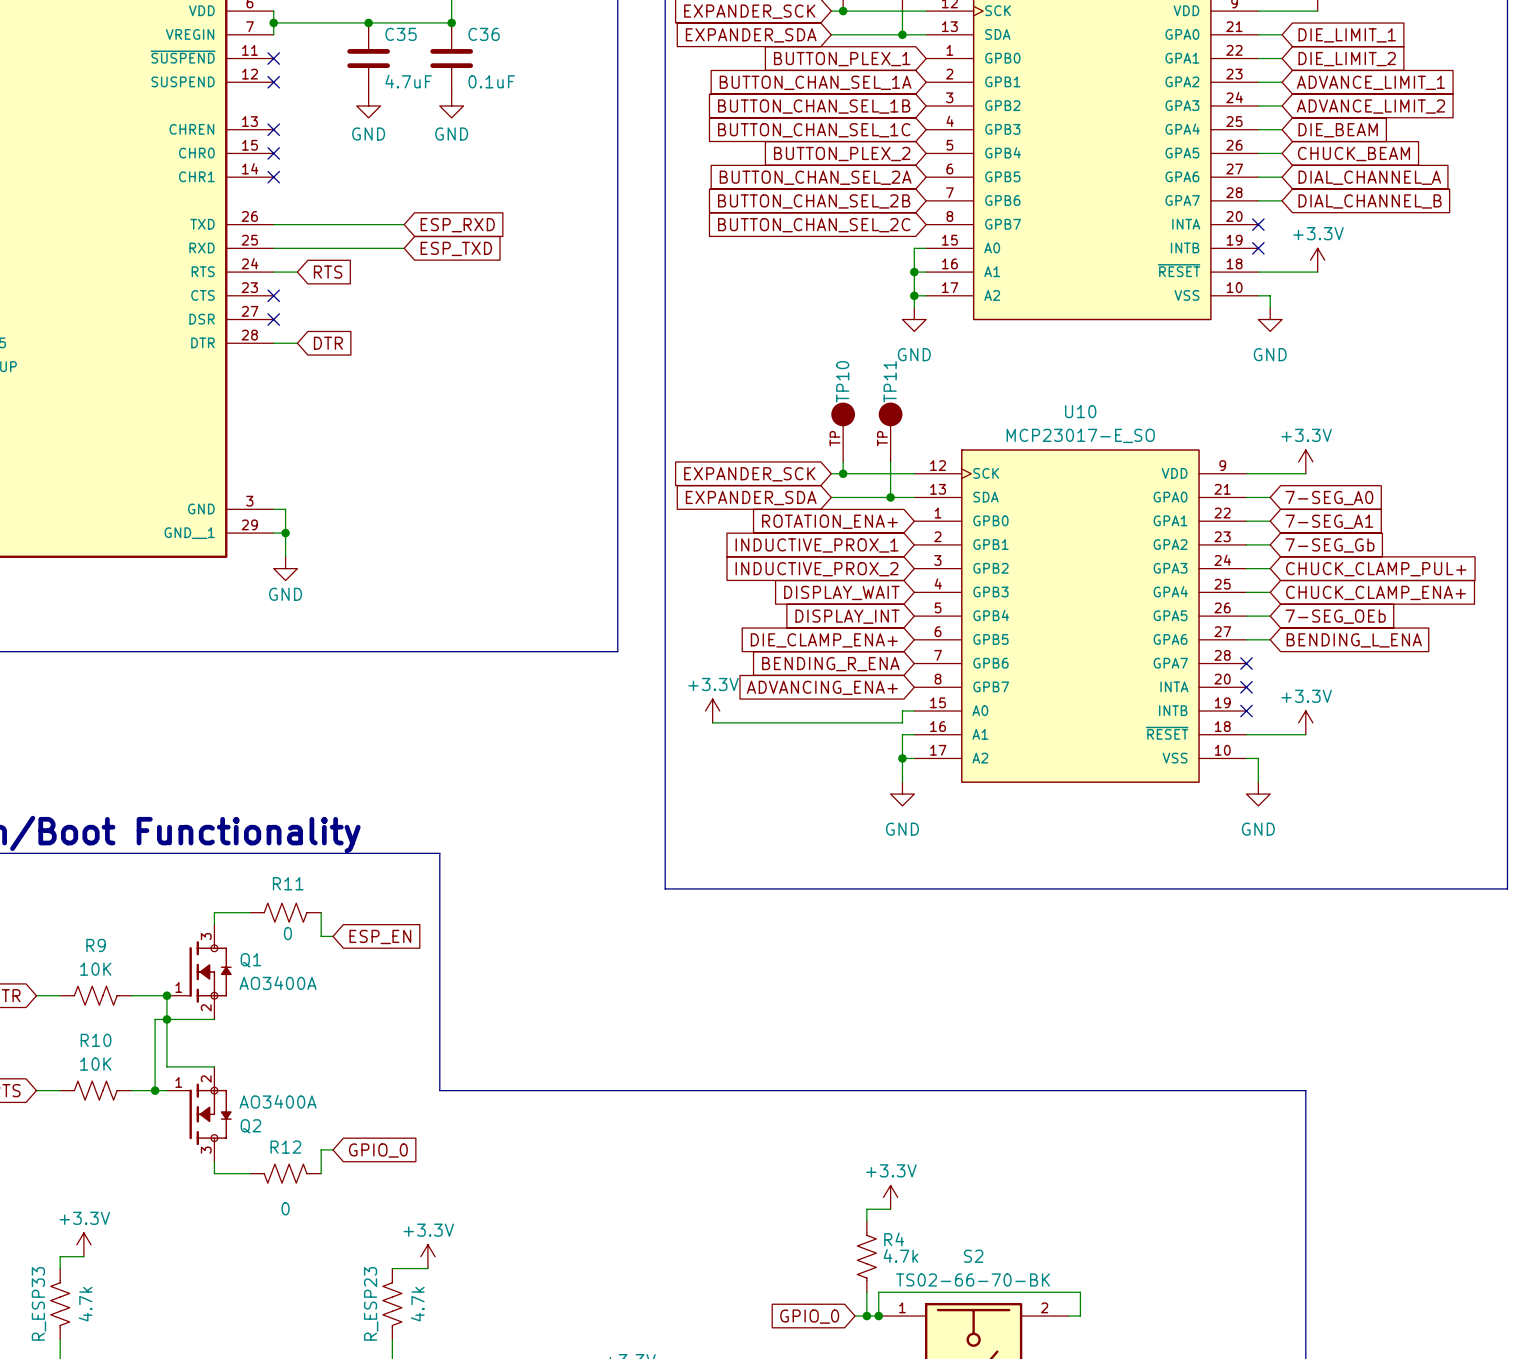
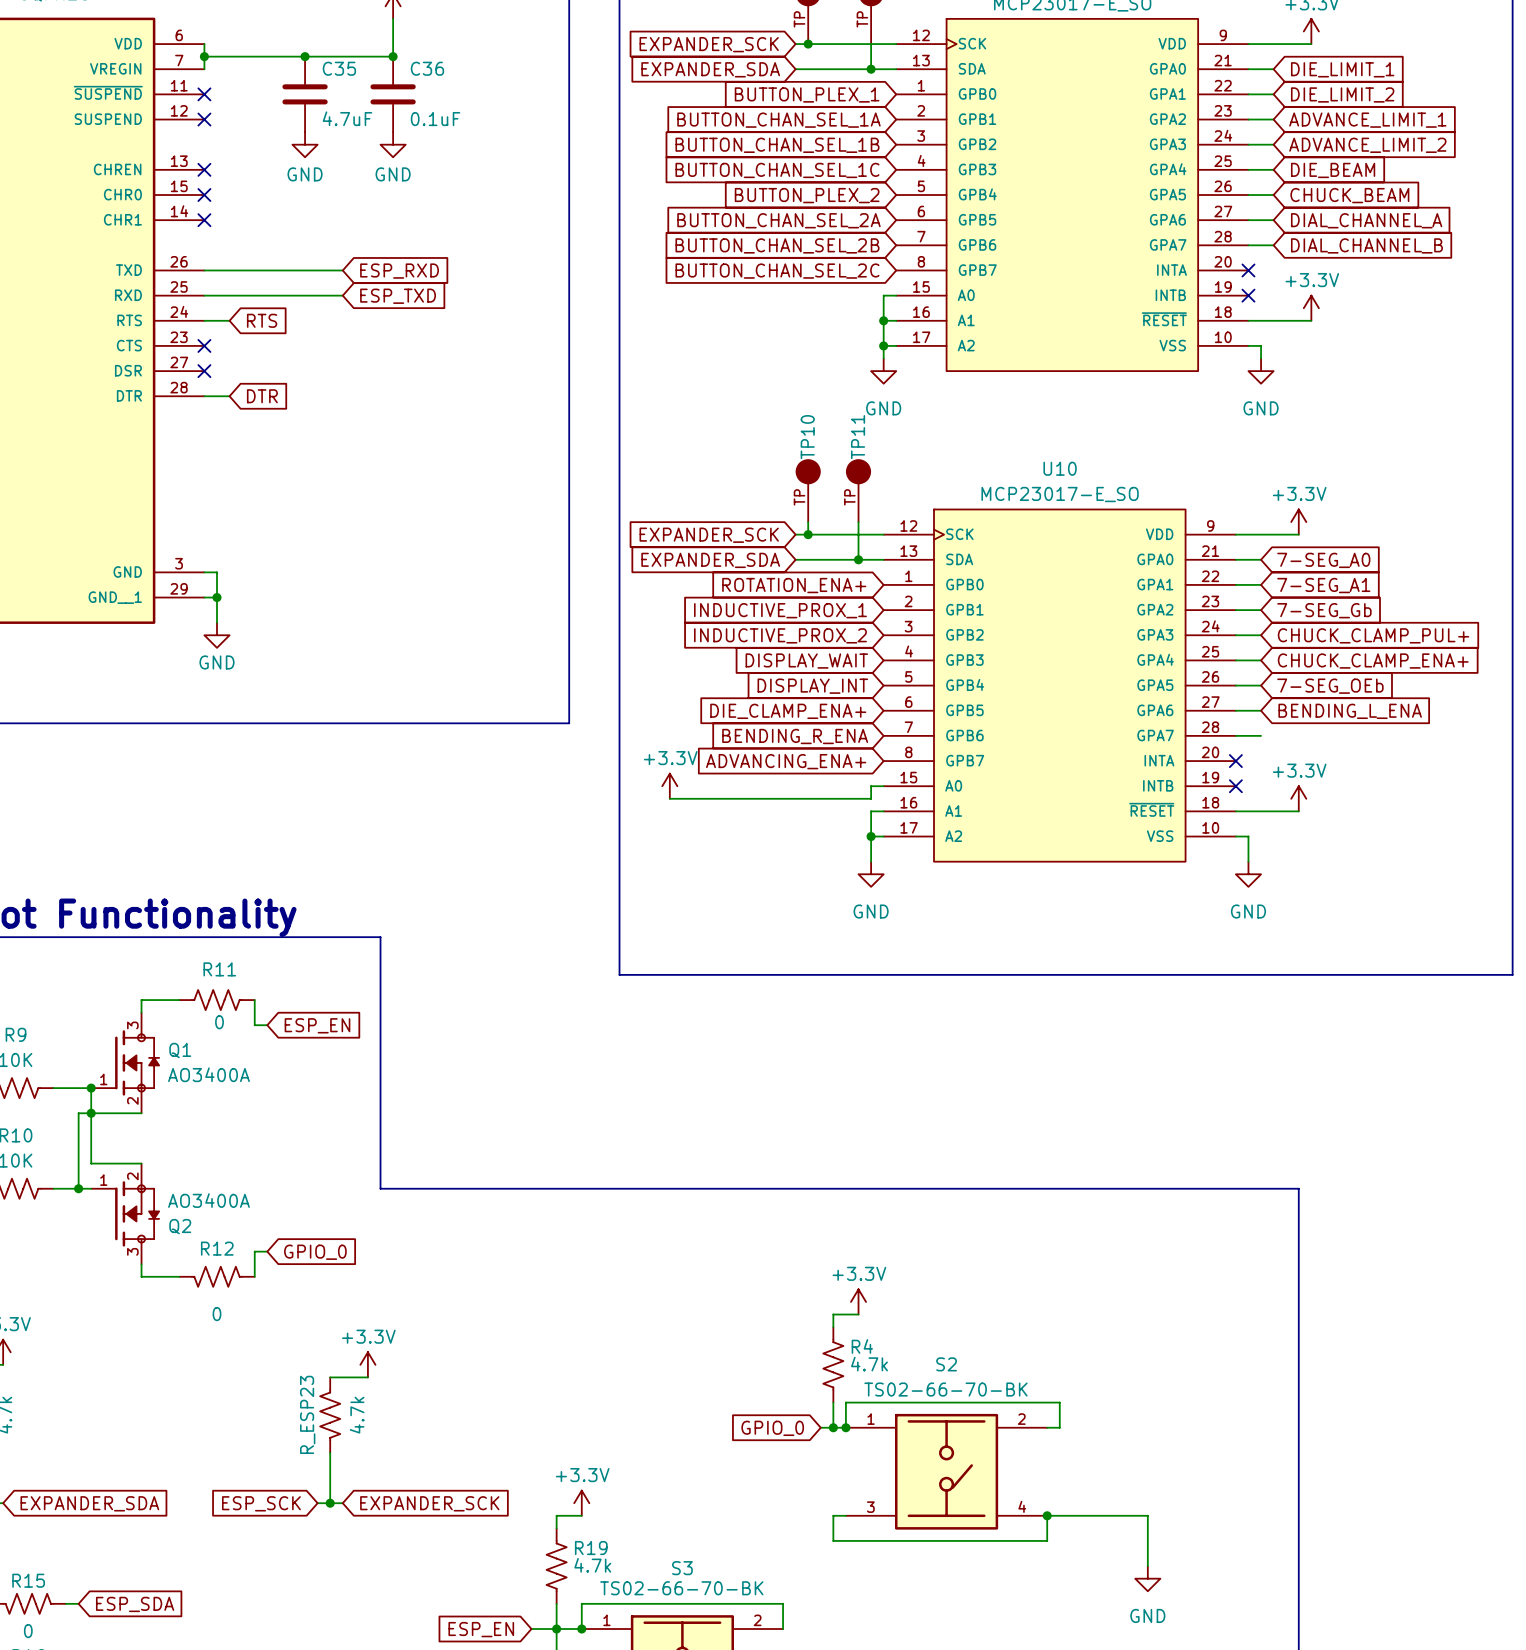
wire: none -> (1235, 735) (1261, 735)
no-connect mark: (1246, 663) -> none

